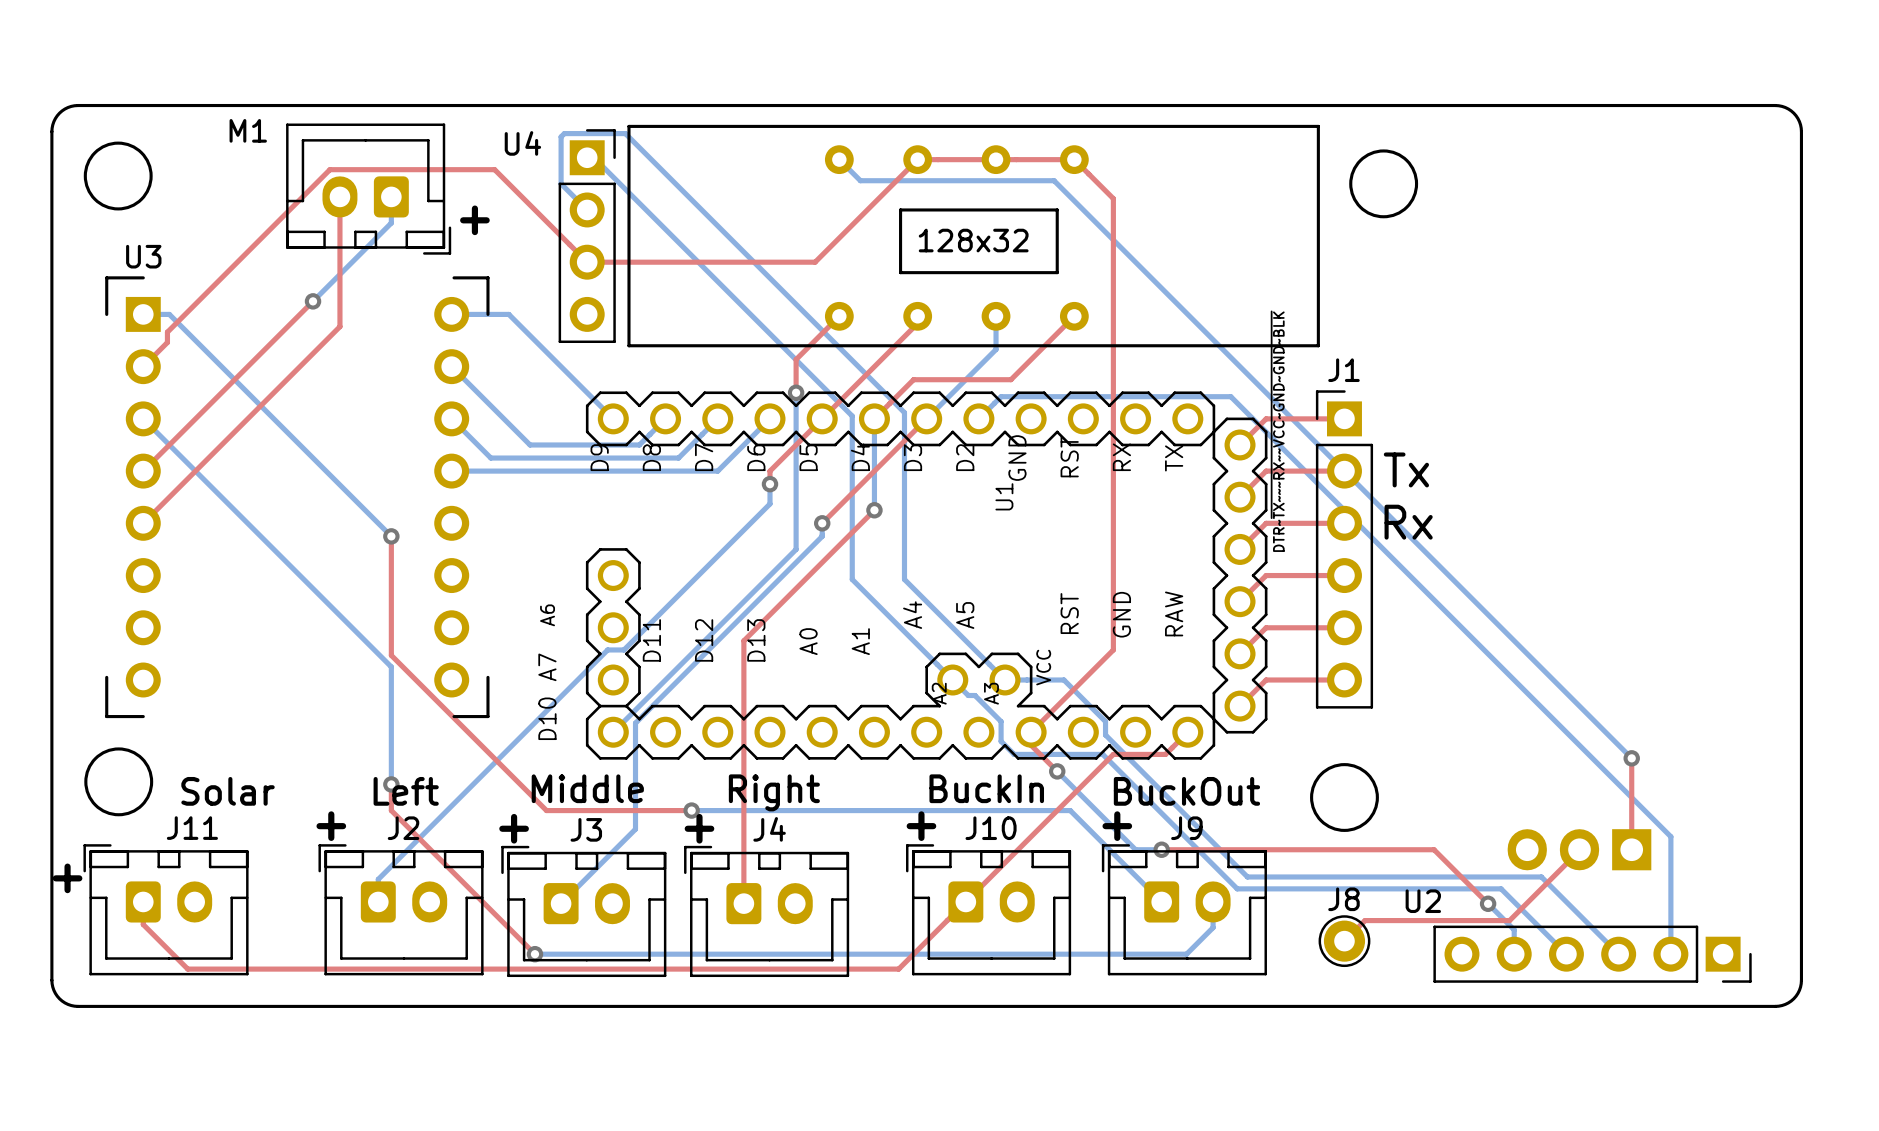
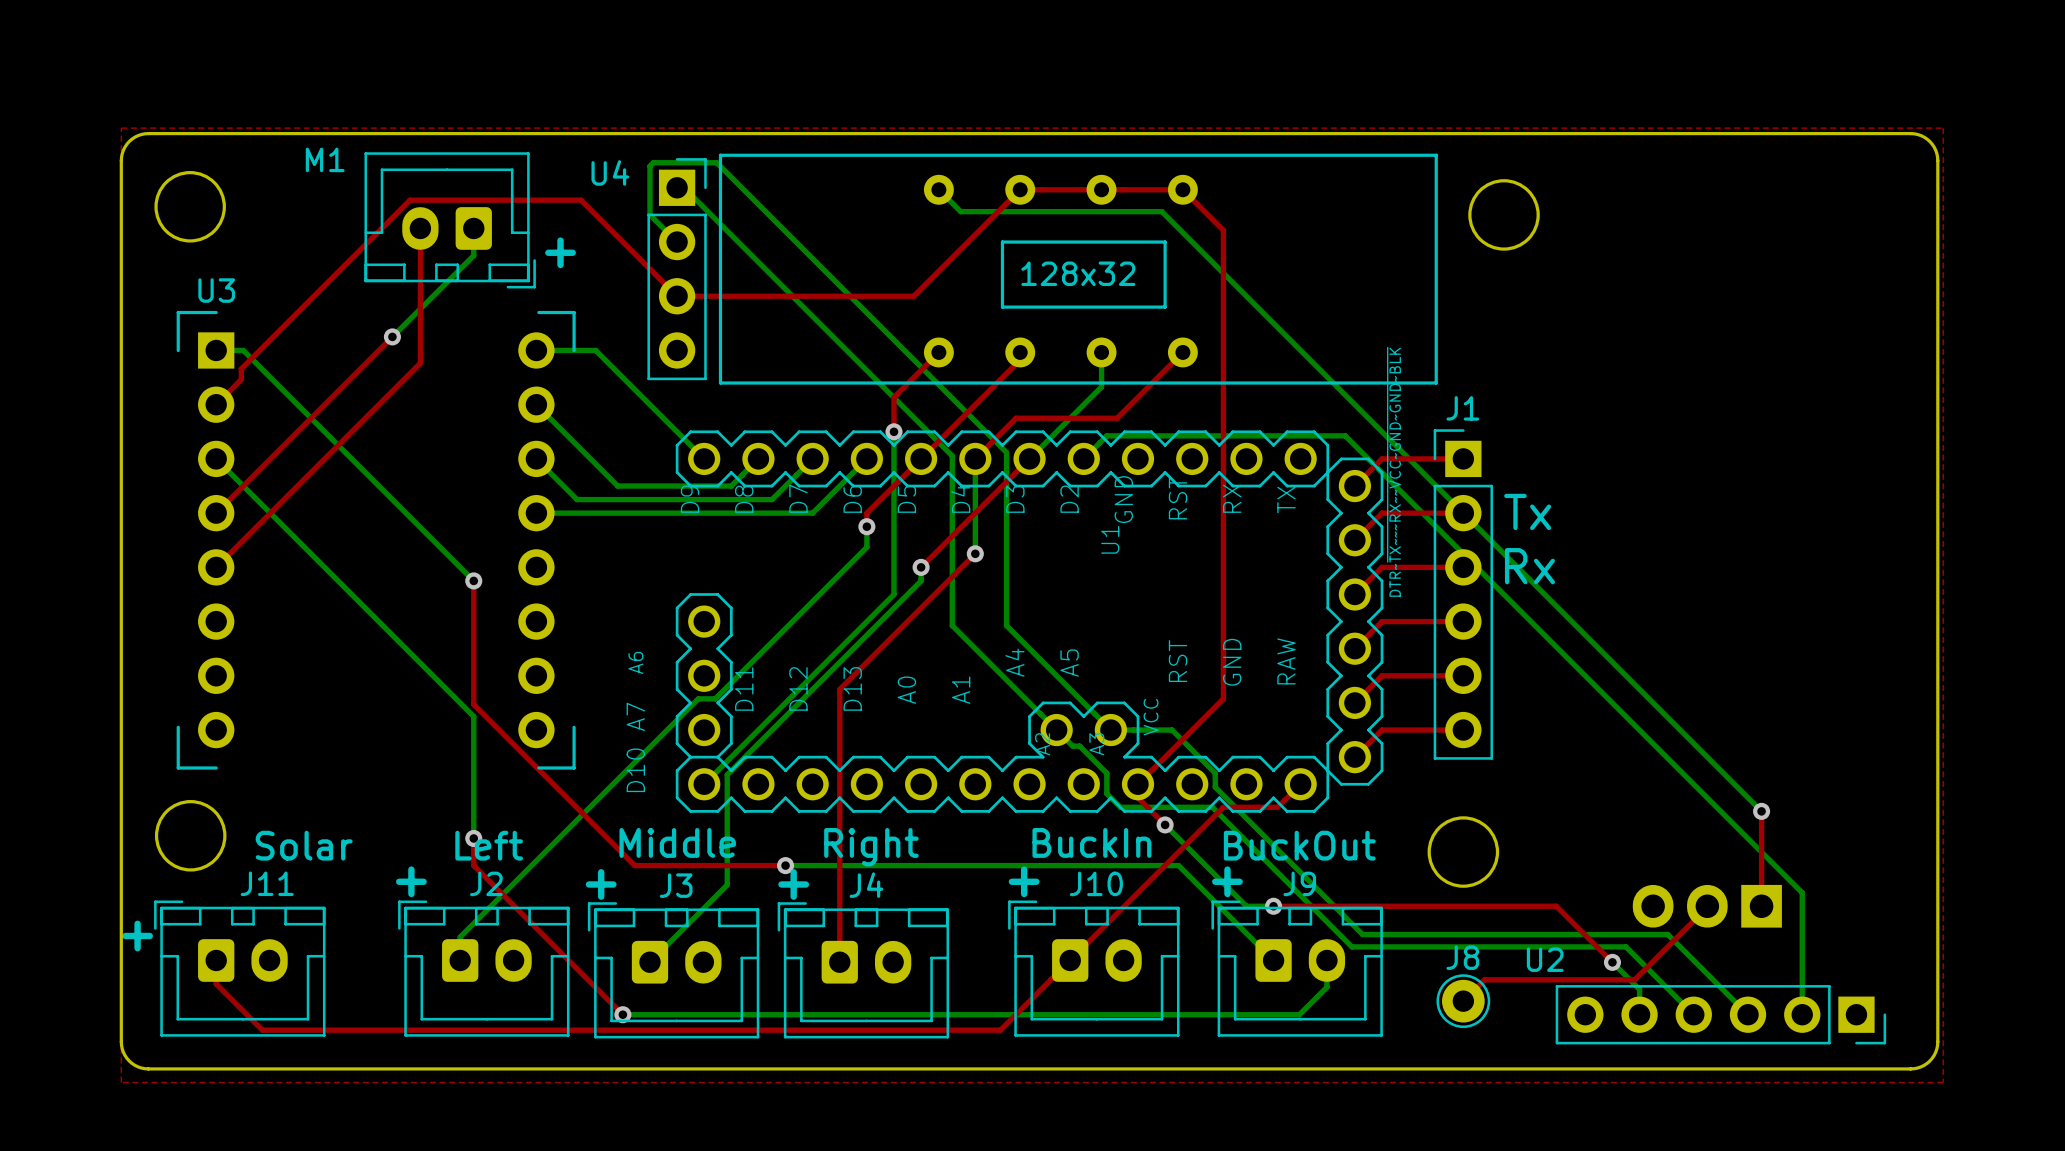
top zone outline: none -> (121, 128) (1943, 128) (1943, 1082) (121, 1082) (121, 128)

